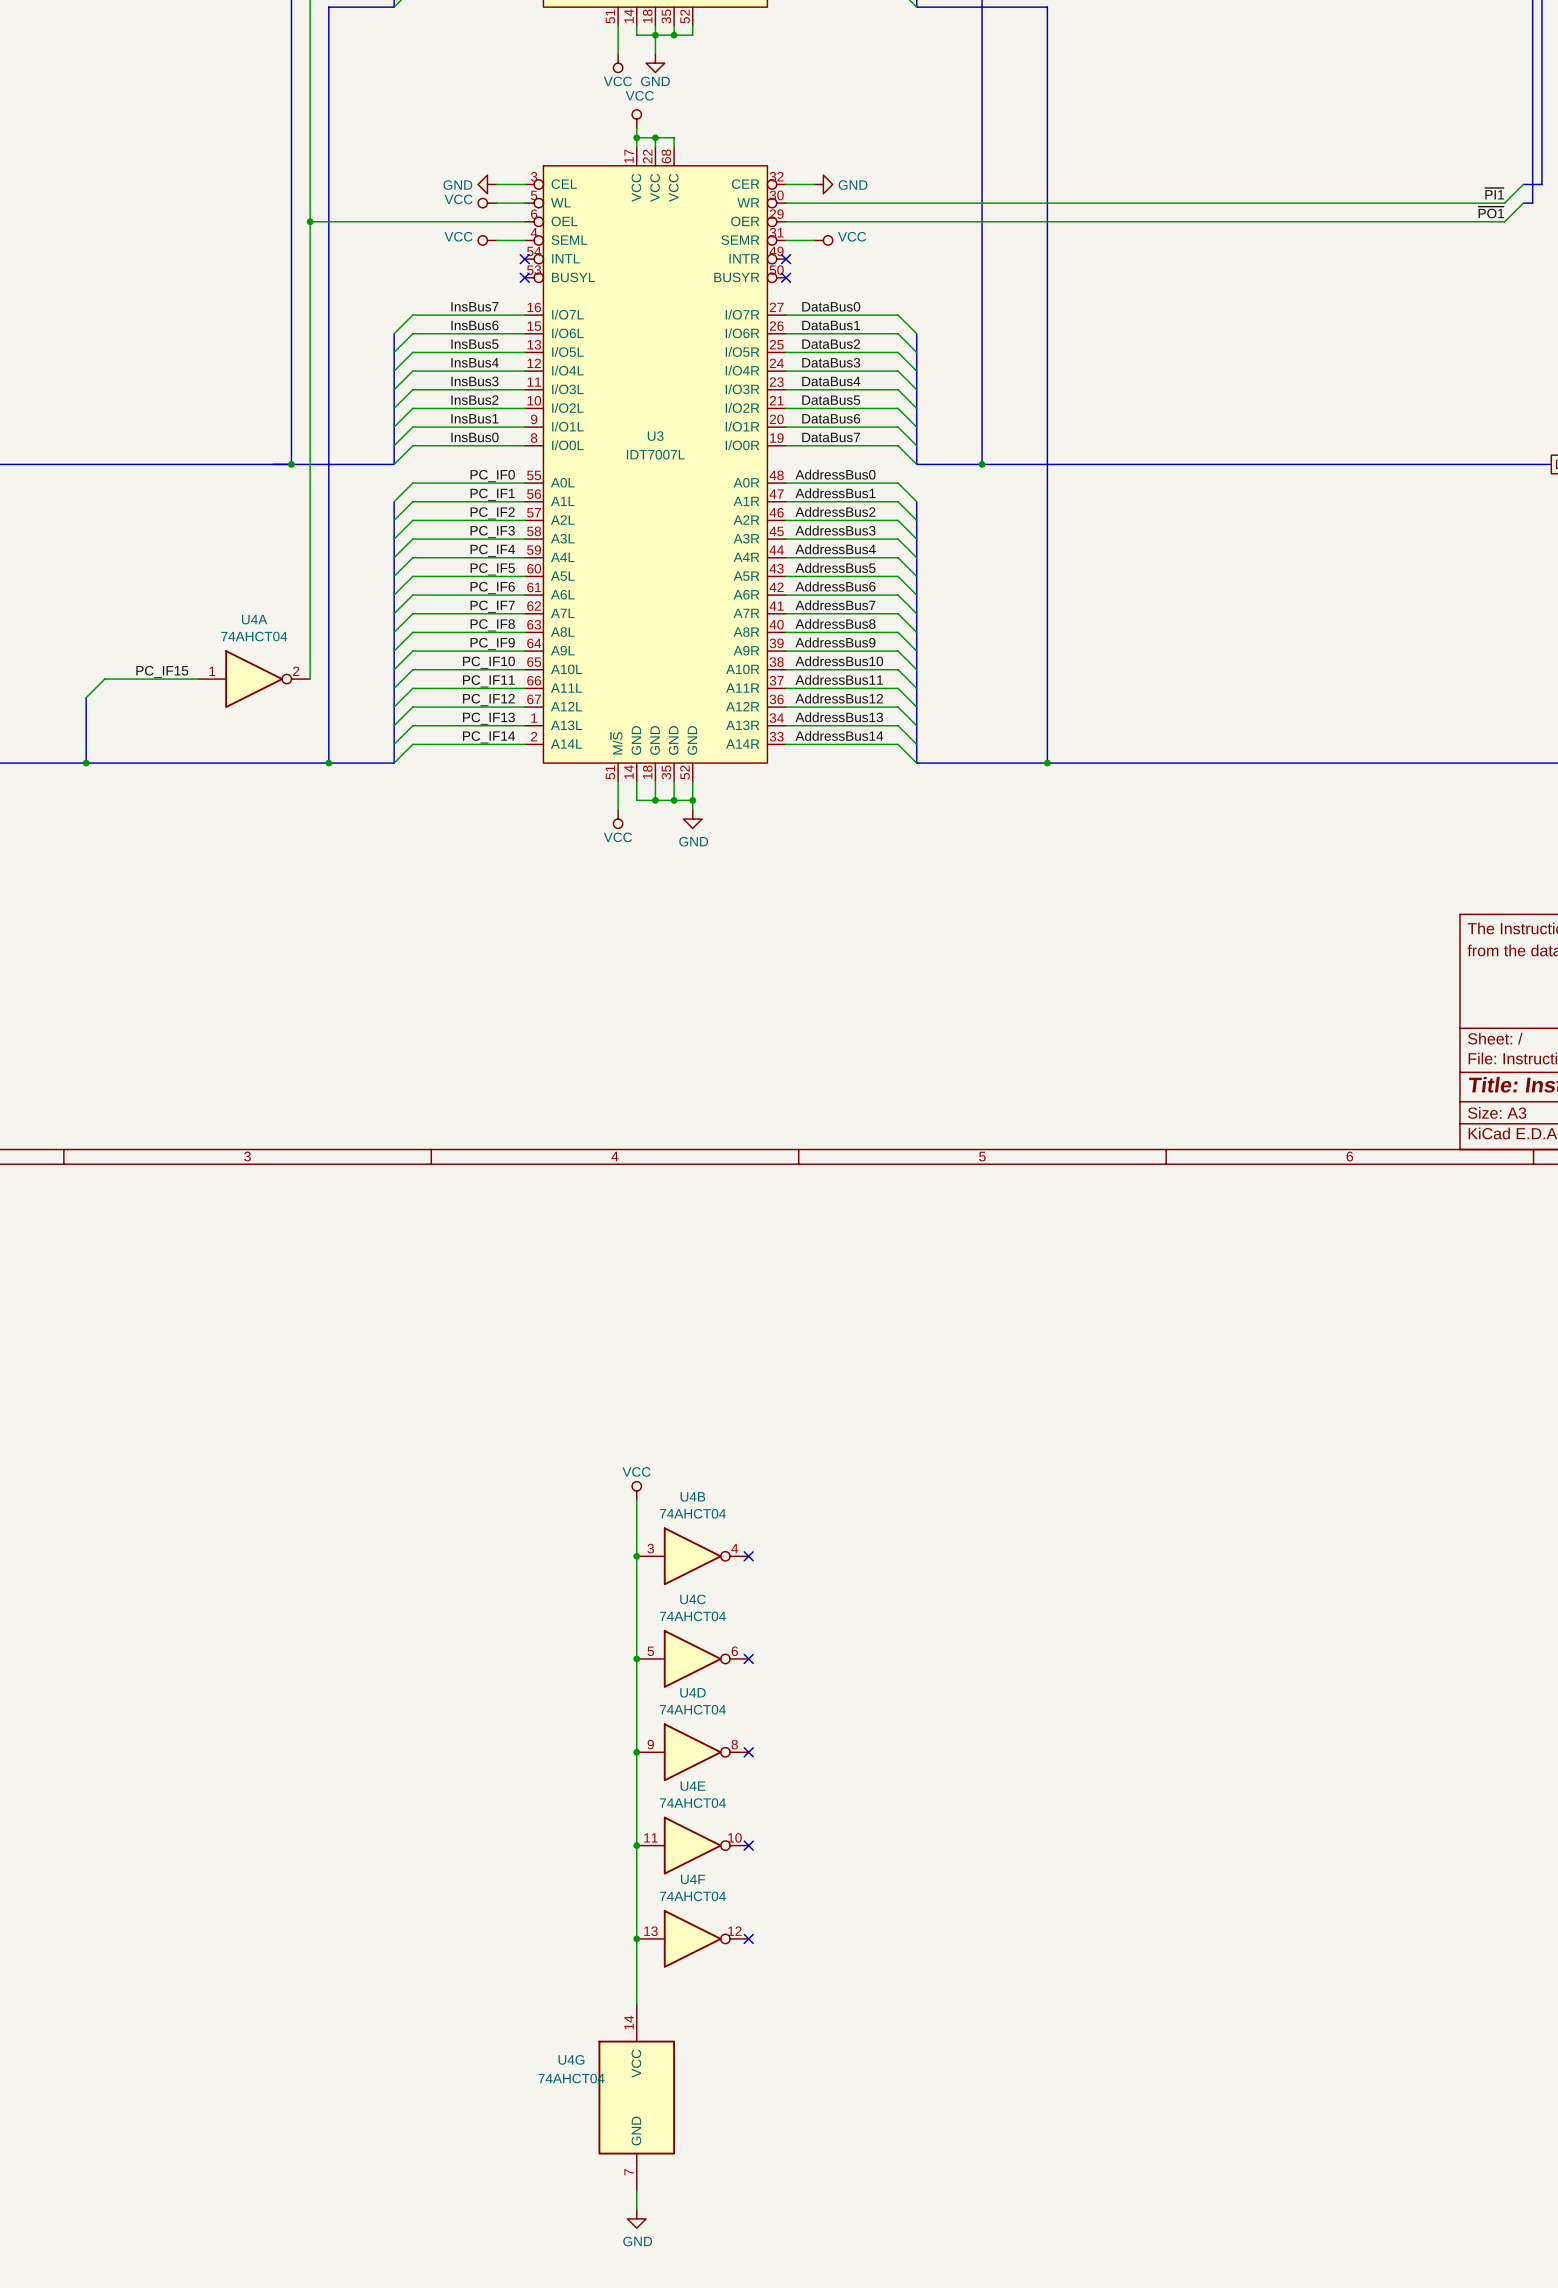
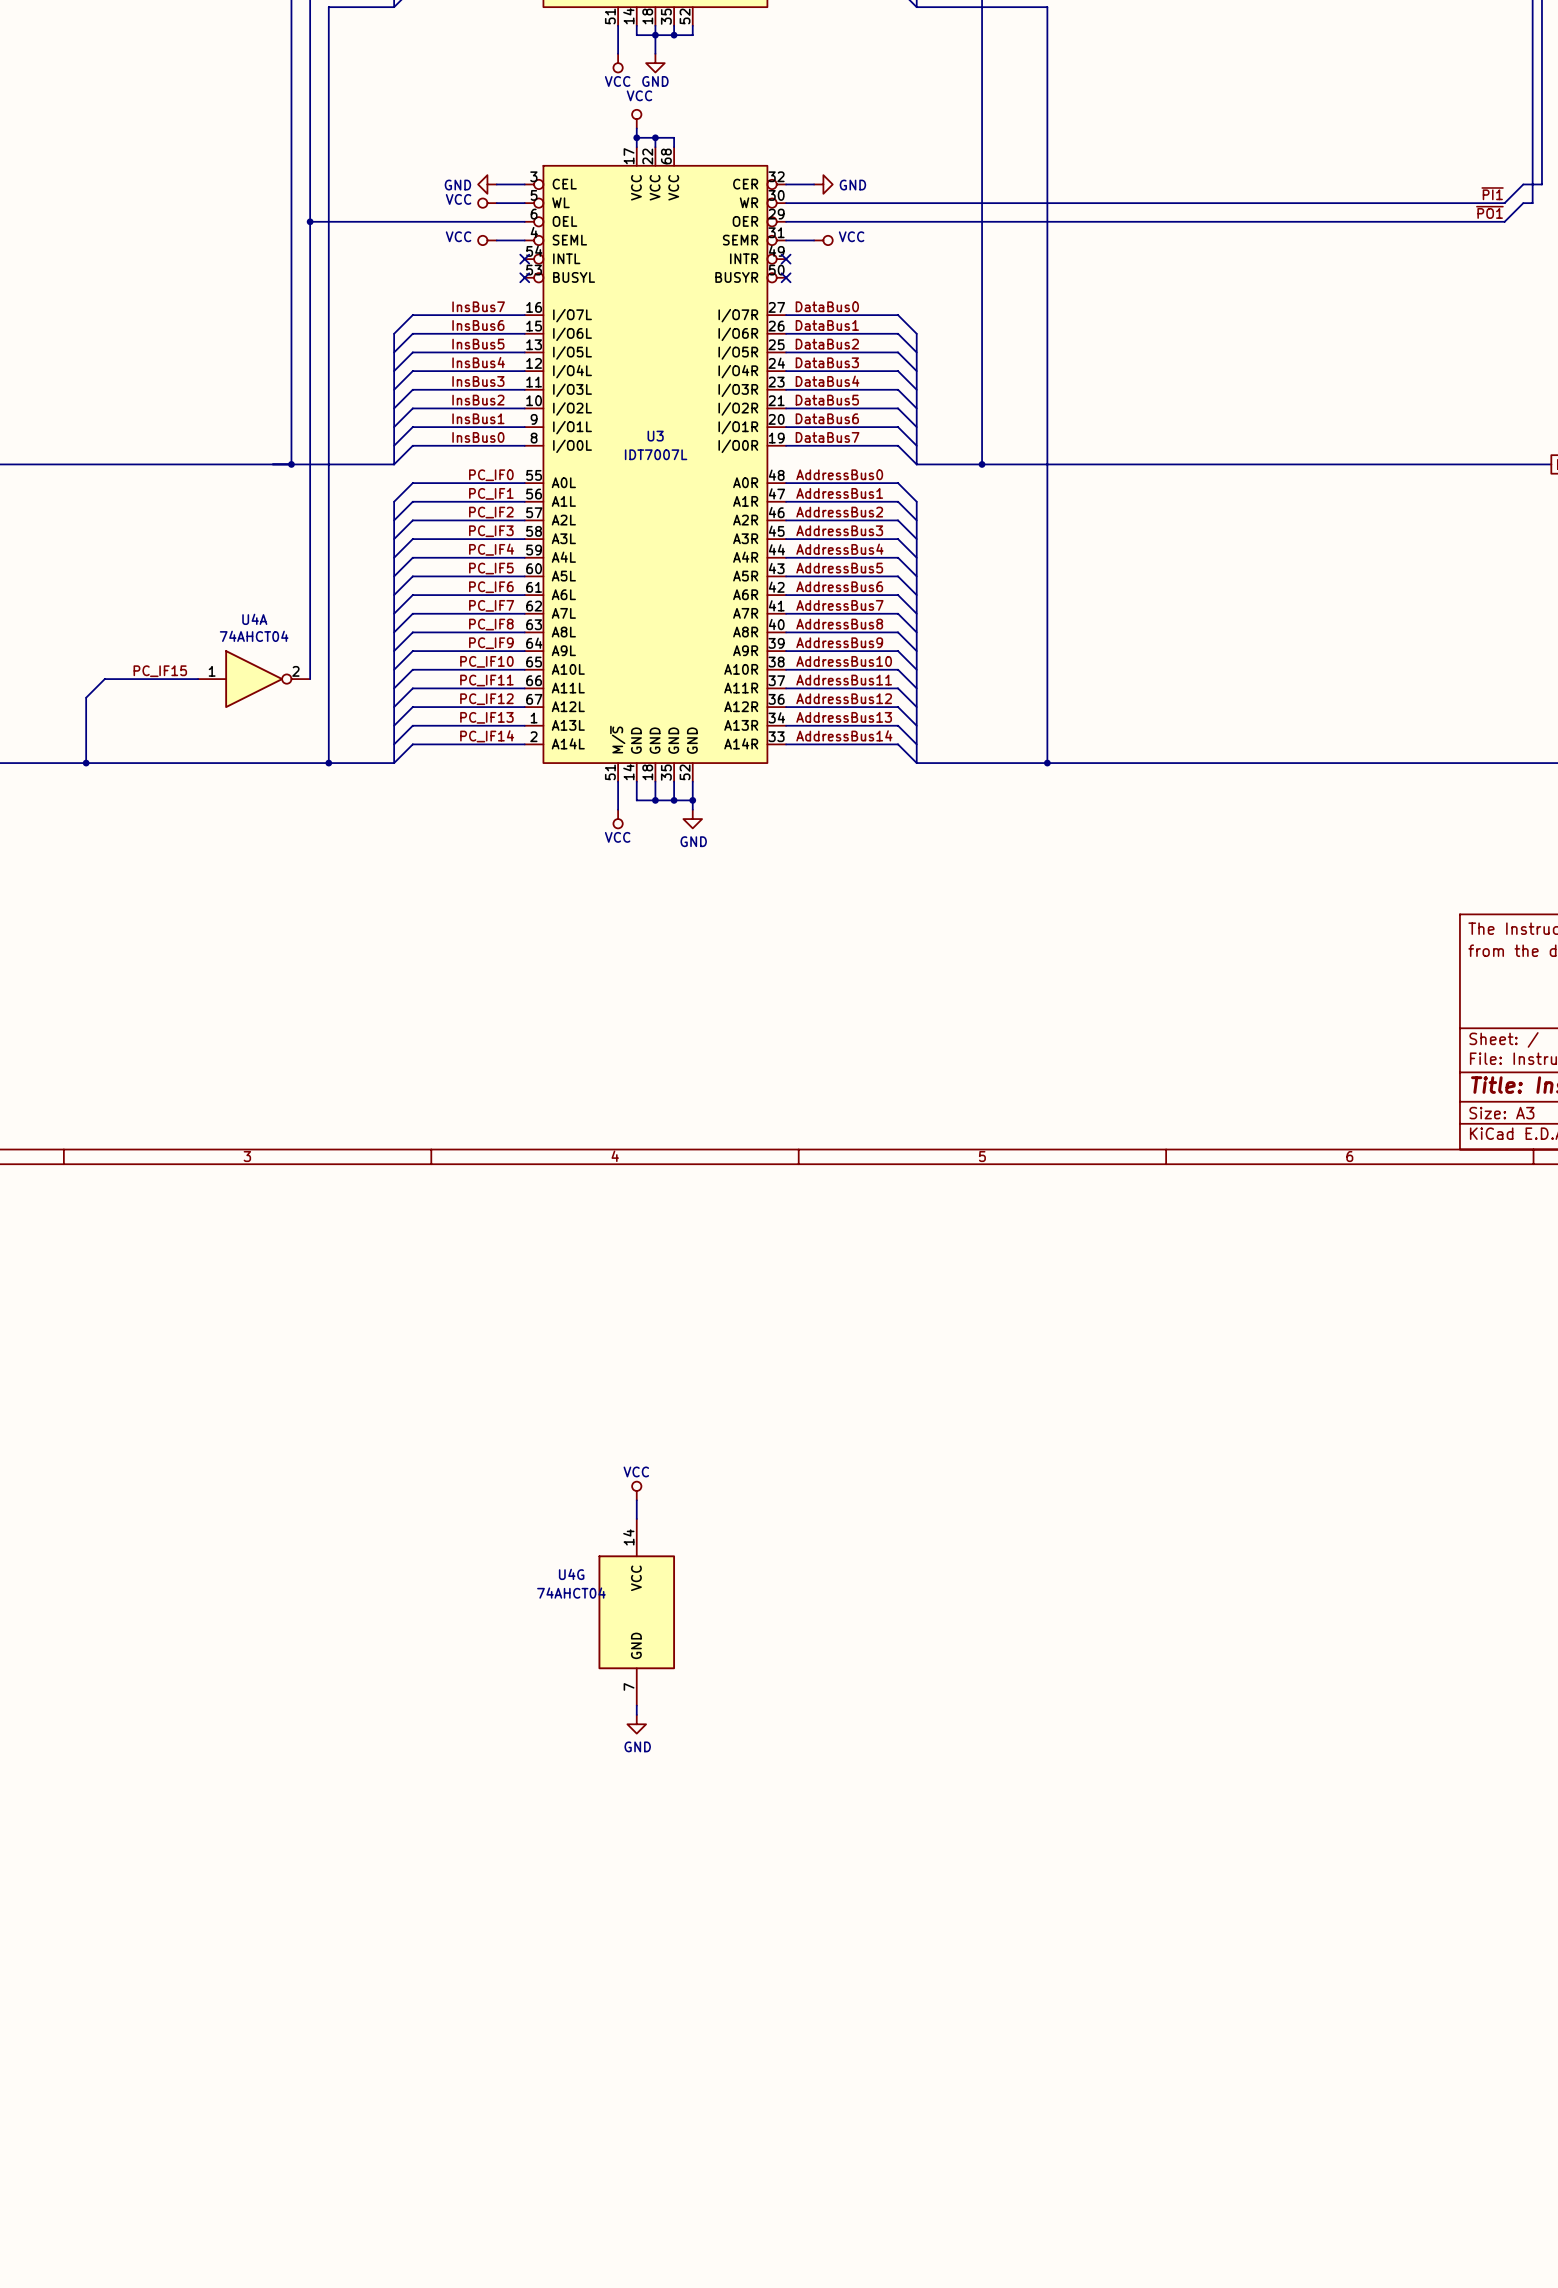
junction: (636, 1556) -> none
U4B: 74AHCT04 (692, 1556) -> none
no-connect mark: (748, 1556) -> none
junction: (636, 1658) -> none
U4C: 74AHCT04 (692, 1658) -> none
no-connect mark: (748, 1658) -> none
wire: (636, 1714) (636, 2004) -> none
power symbol: none -> GND (636, 1724)
junction: (636, 1752) -> none
U4D: 74AHCT04 (692, 1752) -> none
no-connect mark: (748, 1752) -> none
junction: (636, 1845) -> none
U4E: 74AHCT04 (692, 1845) -> none
no-connect mark: (748, 1845) -> none
junction: (636, 1938) -> none
U4F: 74AHCT04 (692, 1938) -> none
no-connect mark: (748, 1938) -> none
U4G position: (636, 2097) -> (636, 1612)
wire: (636, 2190) (636, 2209) -> none
power symbol: GND (636, 2218) -> none

